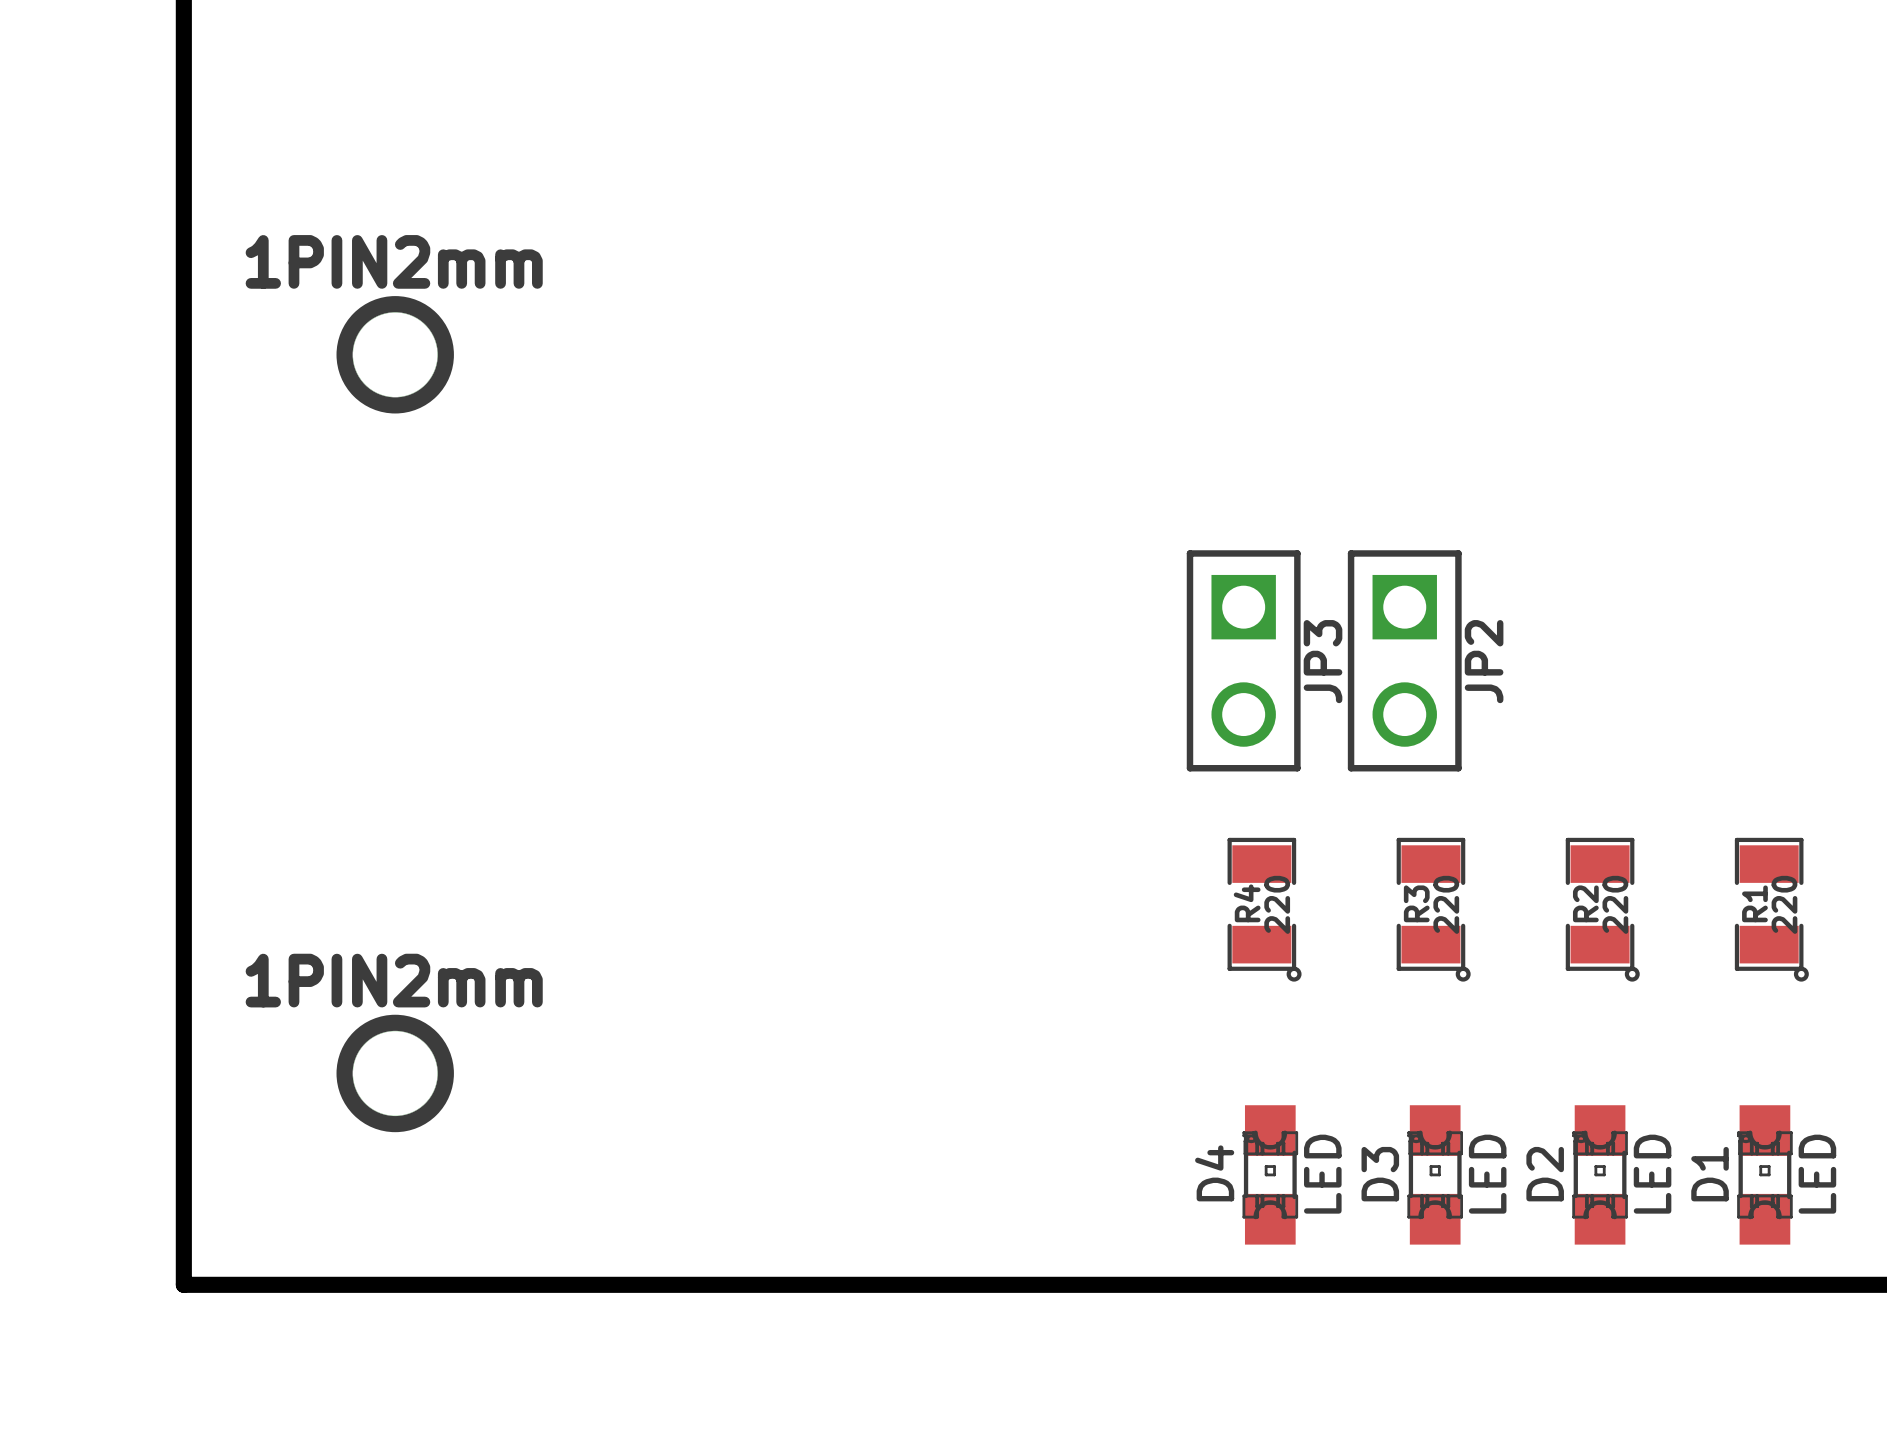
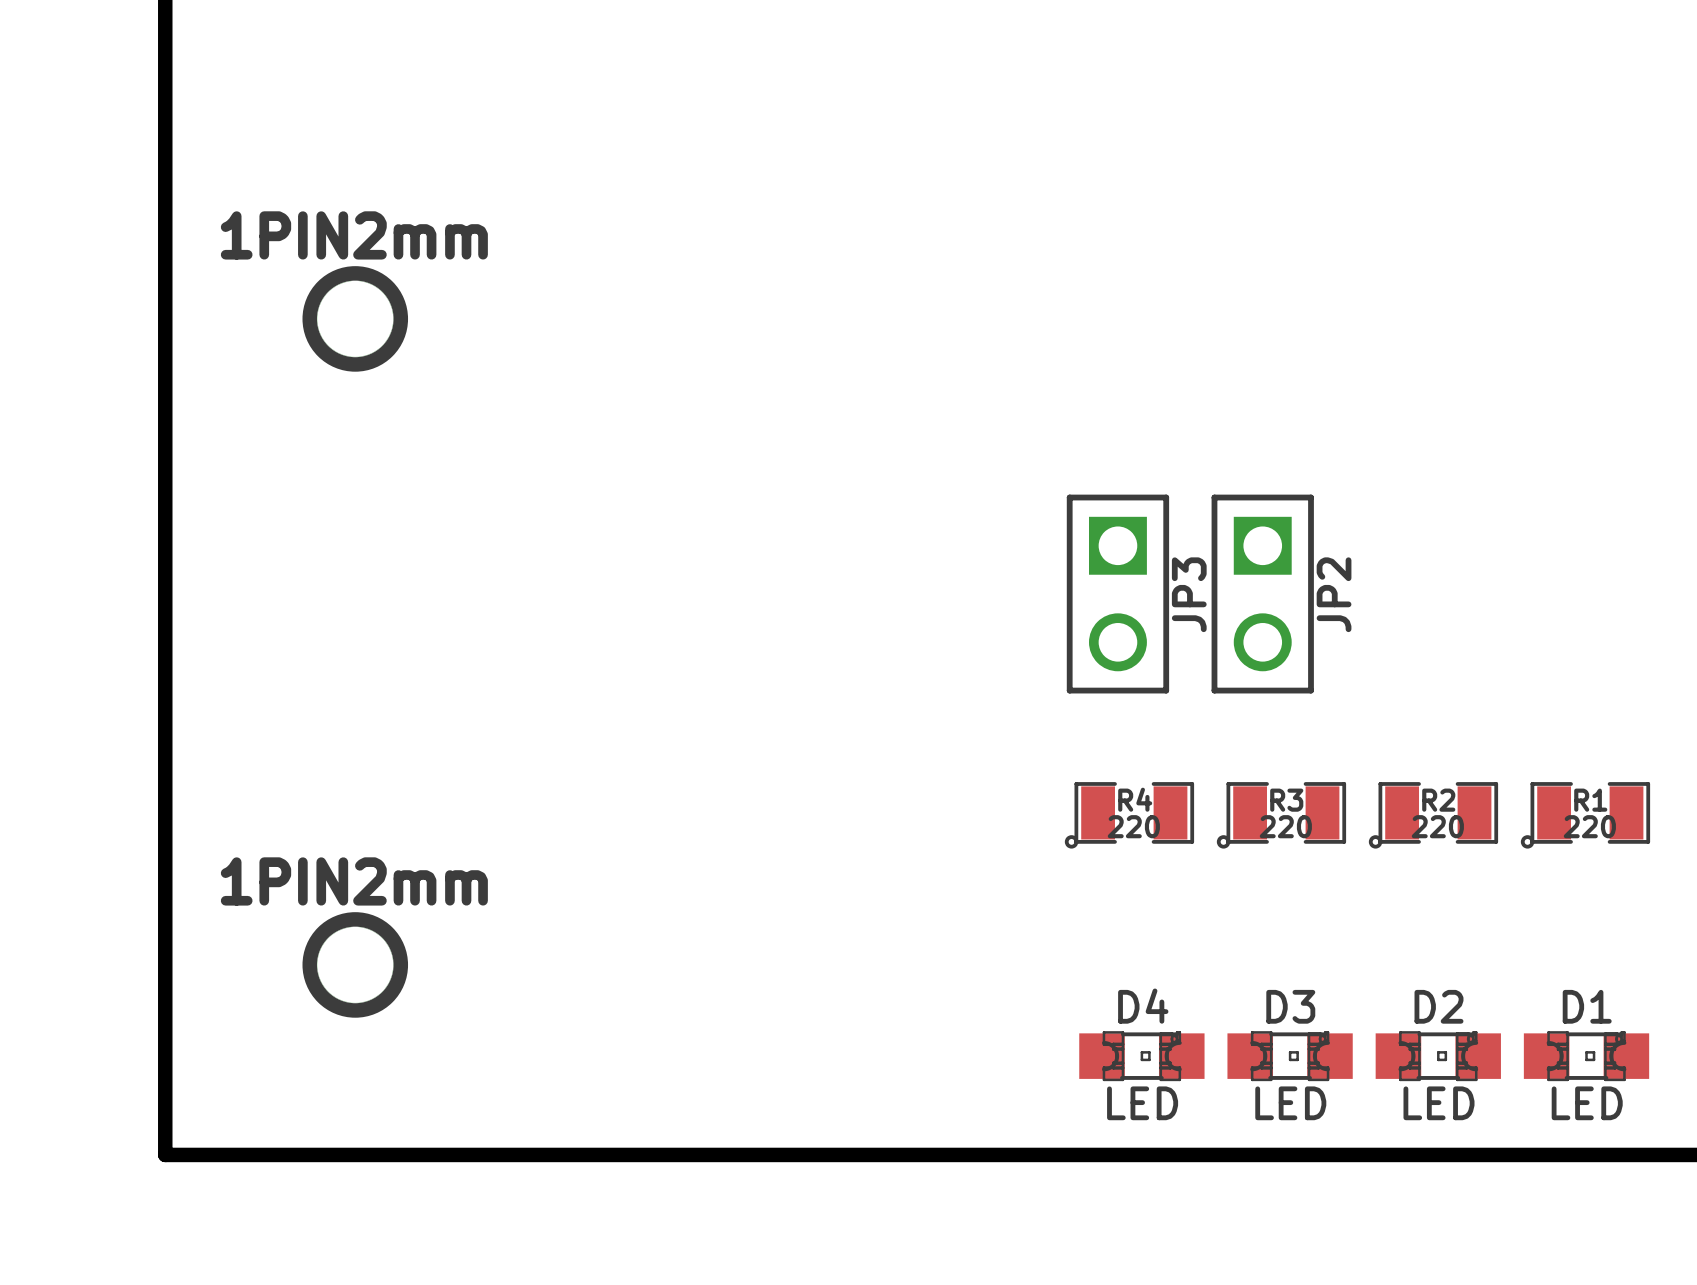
R4 rotation: 0° (1264, 909) -> 90° clockwise (1129, 815)
R3 rotation: 0° (1433, 909) -> 90° clockwise (1281, 815)
R2 rotation: 0° (1602, 909) -> 90° clockwise (1433, 815)
R1 rotation: 0° (1771, 909) -> 90° clockwise (1585, 815)
D4 rotation: 0° (1270, 1174) -> 90° clockwise (1141, 1056)
D3 rotation: 0° (1435, 1174) -> 90° clockwise (1290, 1056)
D2 rotation: 0° (1600, 1174) -> 90° clockwise (1438, 1056)
D1 rotation: 0° (1764, 1174) -> 90° clockwise (1586, 1056)

